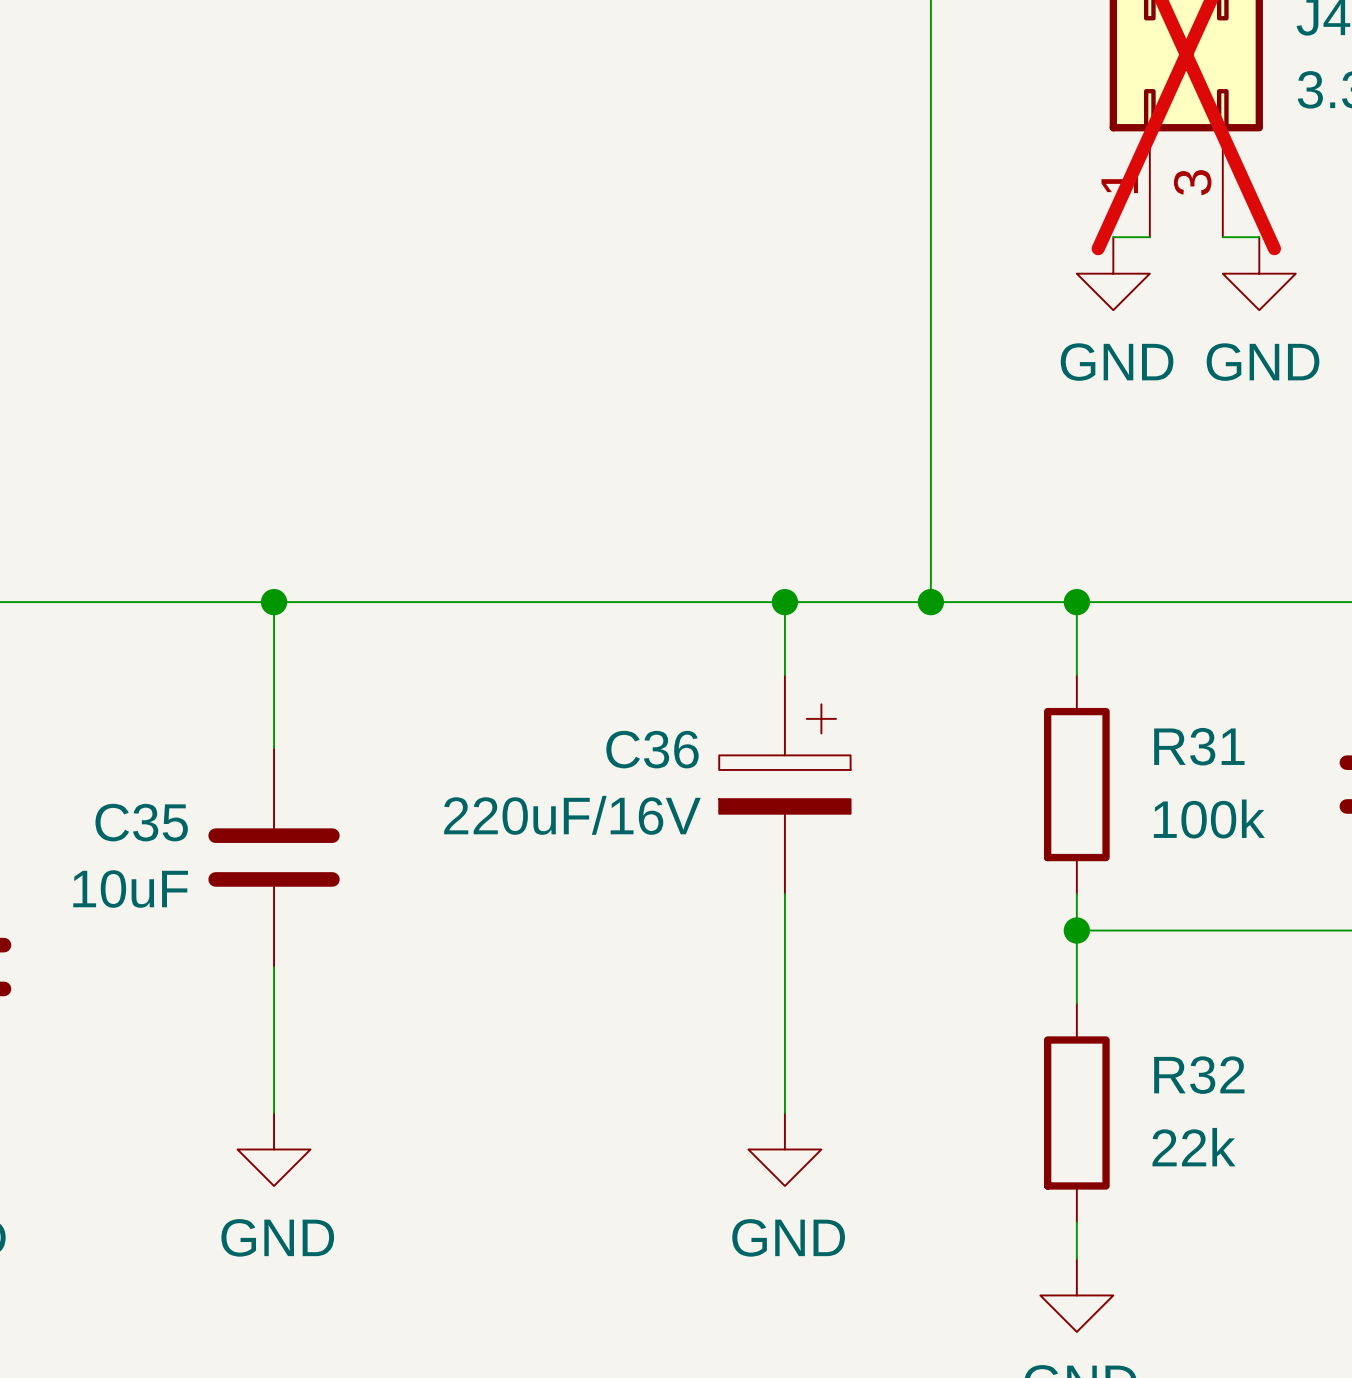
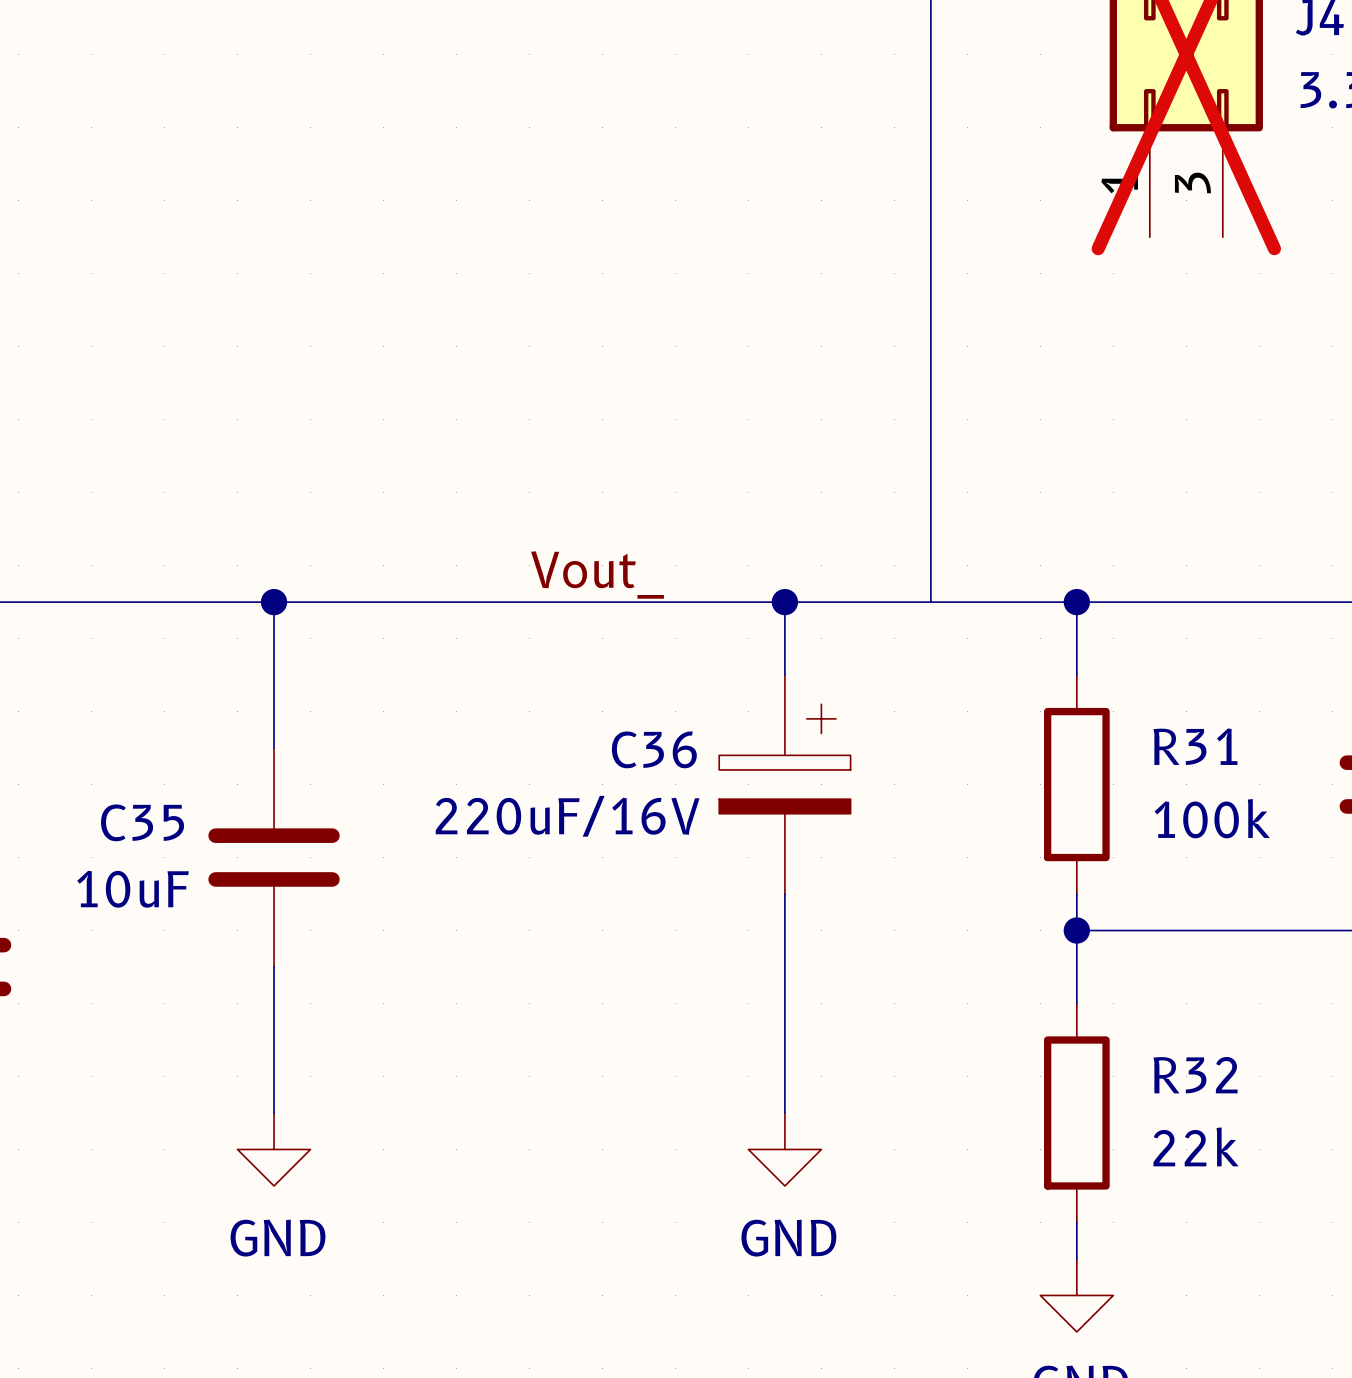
wire: (1113, 237) (1149, 237) -> none
wire: (1222, 237) (1259, 237) -> none
power symbol: GND (1113, 273) -> none
power symbol: GND (1259, 273) -> none
label: none -> Vout_ (597, 575)
junction: (930, 602) -> none

